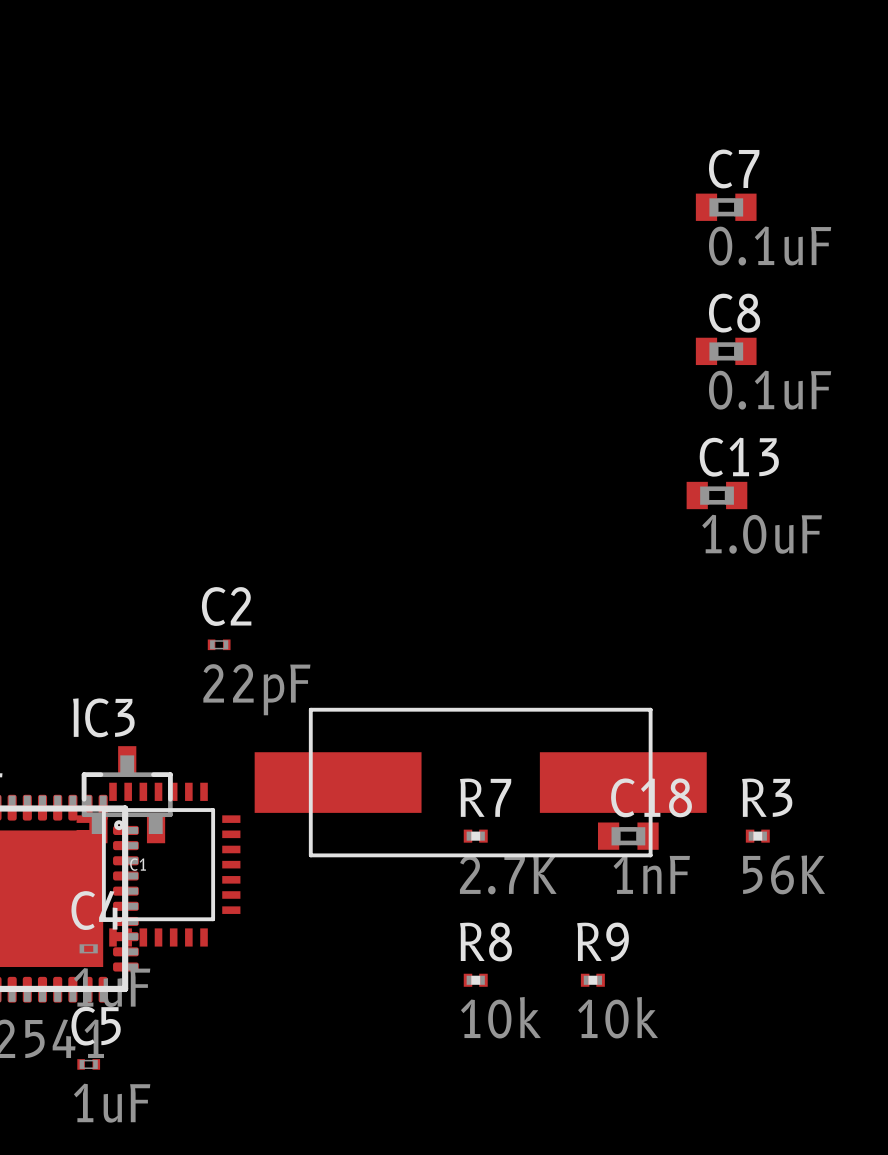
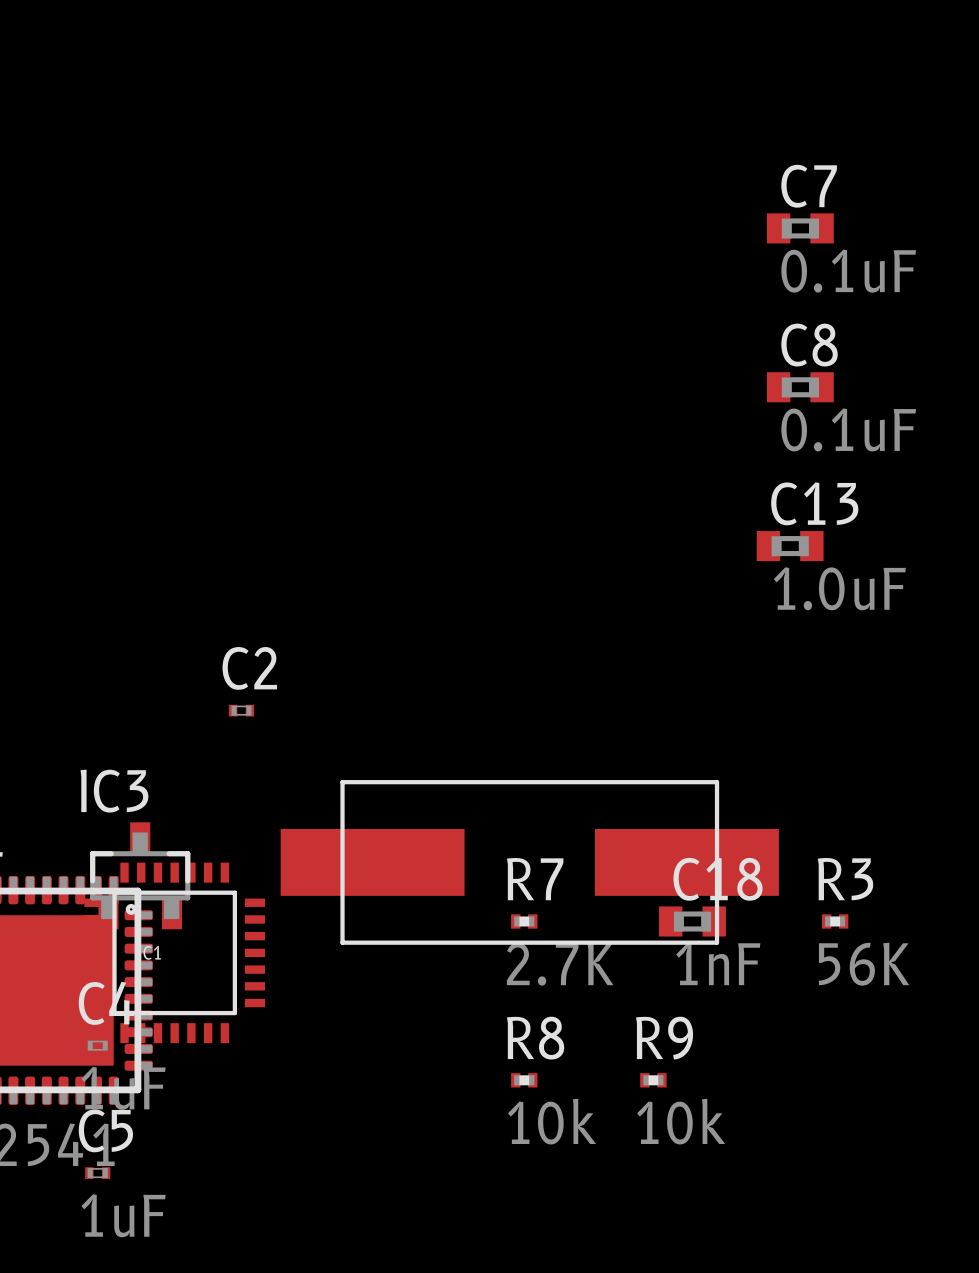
C2 value: 22pF (256, 689) -> none

